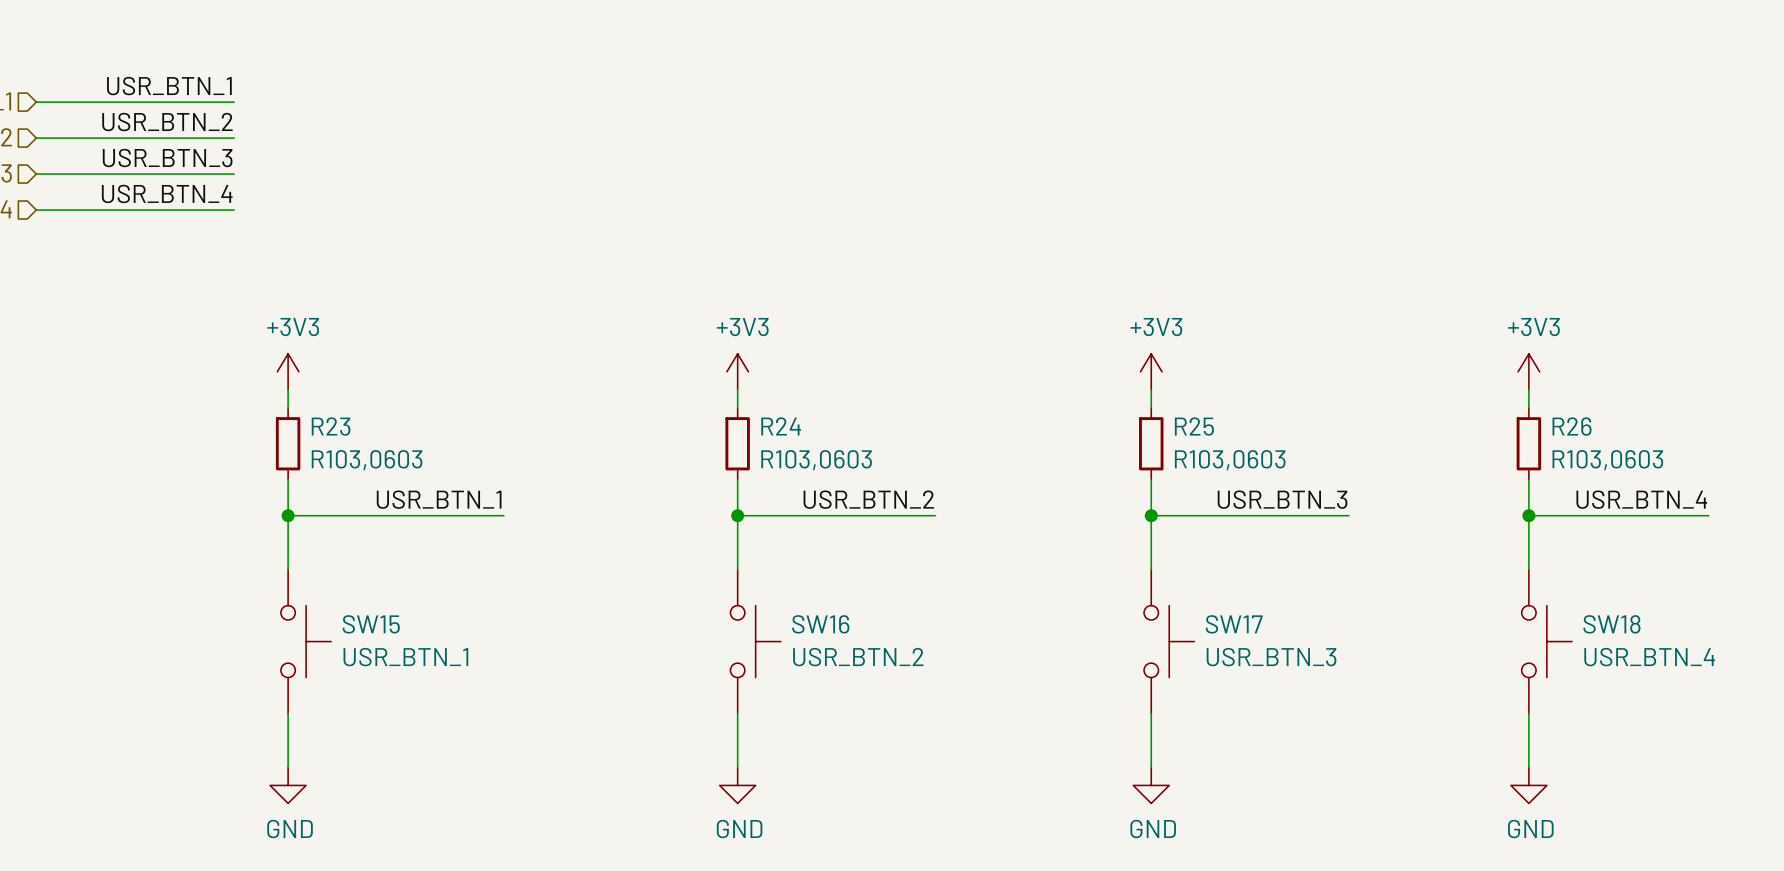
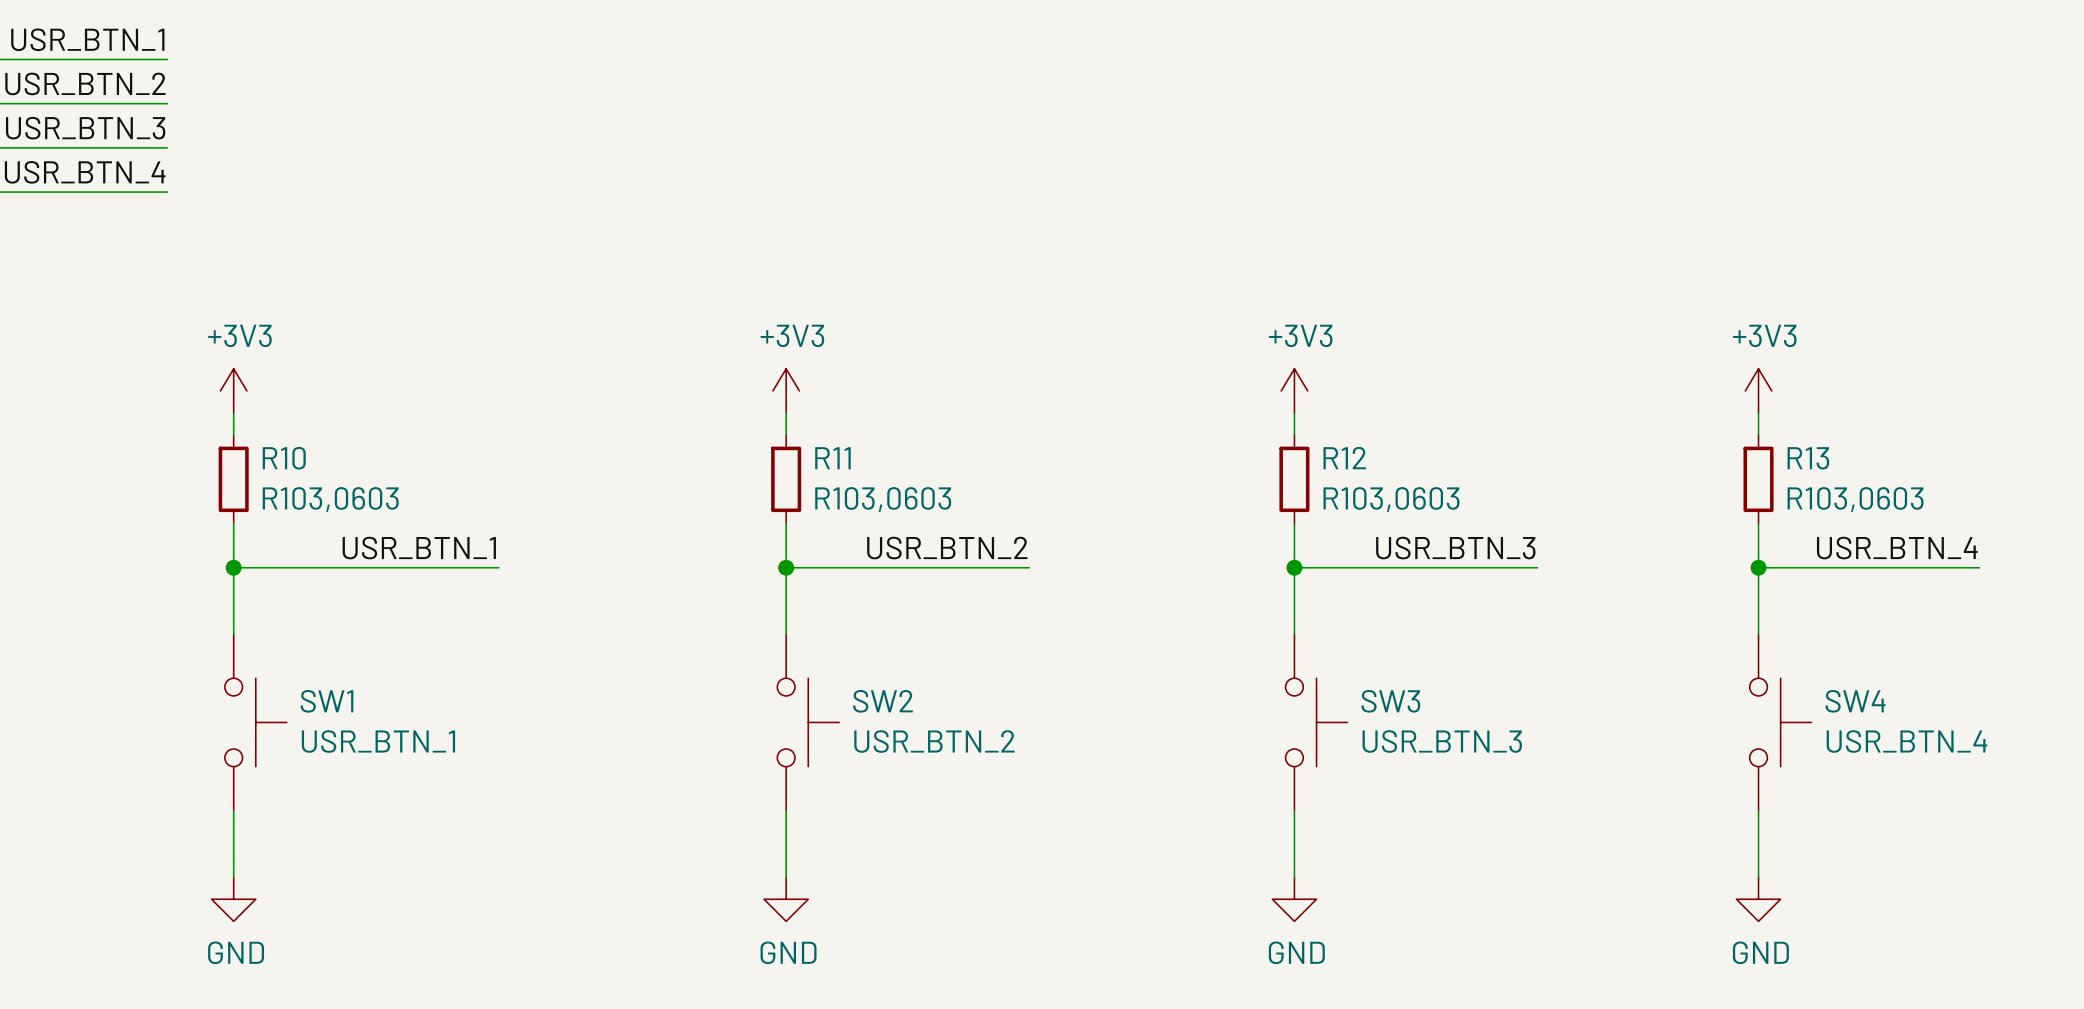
R23 name: R23 (331, 426) -> R10 (284, 458)
R24 name: R24 (781, 426) -> R11 (832, 458)
R25 name: R25 (1194, 426) -> R12 (1344, 458)
R26 name: R26 (1572, 426) -> R13 (1808, 458)
SW15 name: SW15 (371, 624) -> SW1 (327, 701)
SW16 name: SW16 (820, 624) -> SW2 (883, 701)
SW17 name: SW17 (1234, 624) -> SW3 (1390, 701)
SW18 name: SW18 (1611, 624) -> SW4 (1855, 701)

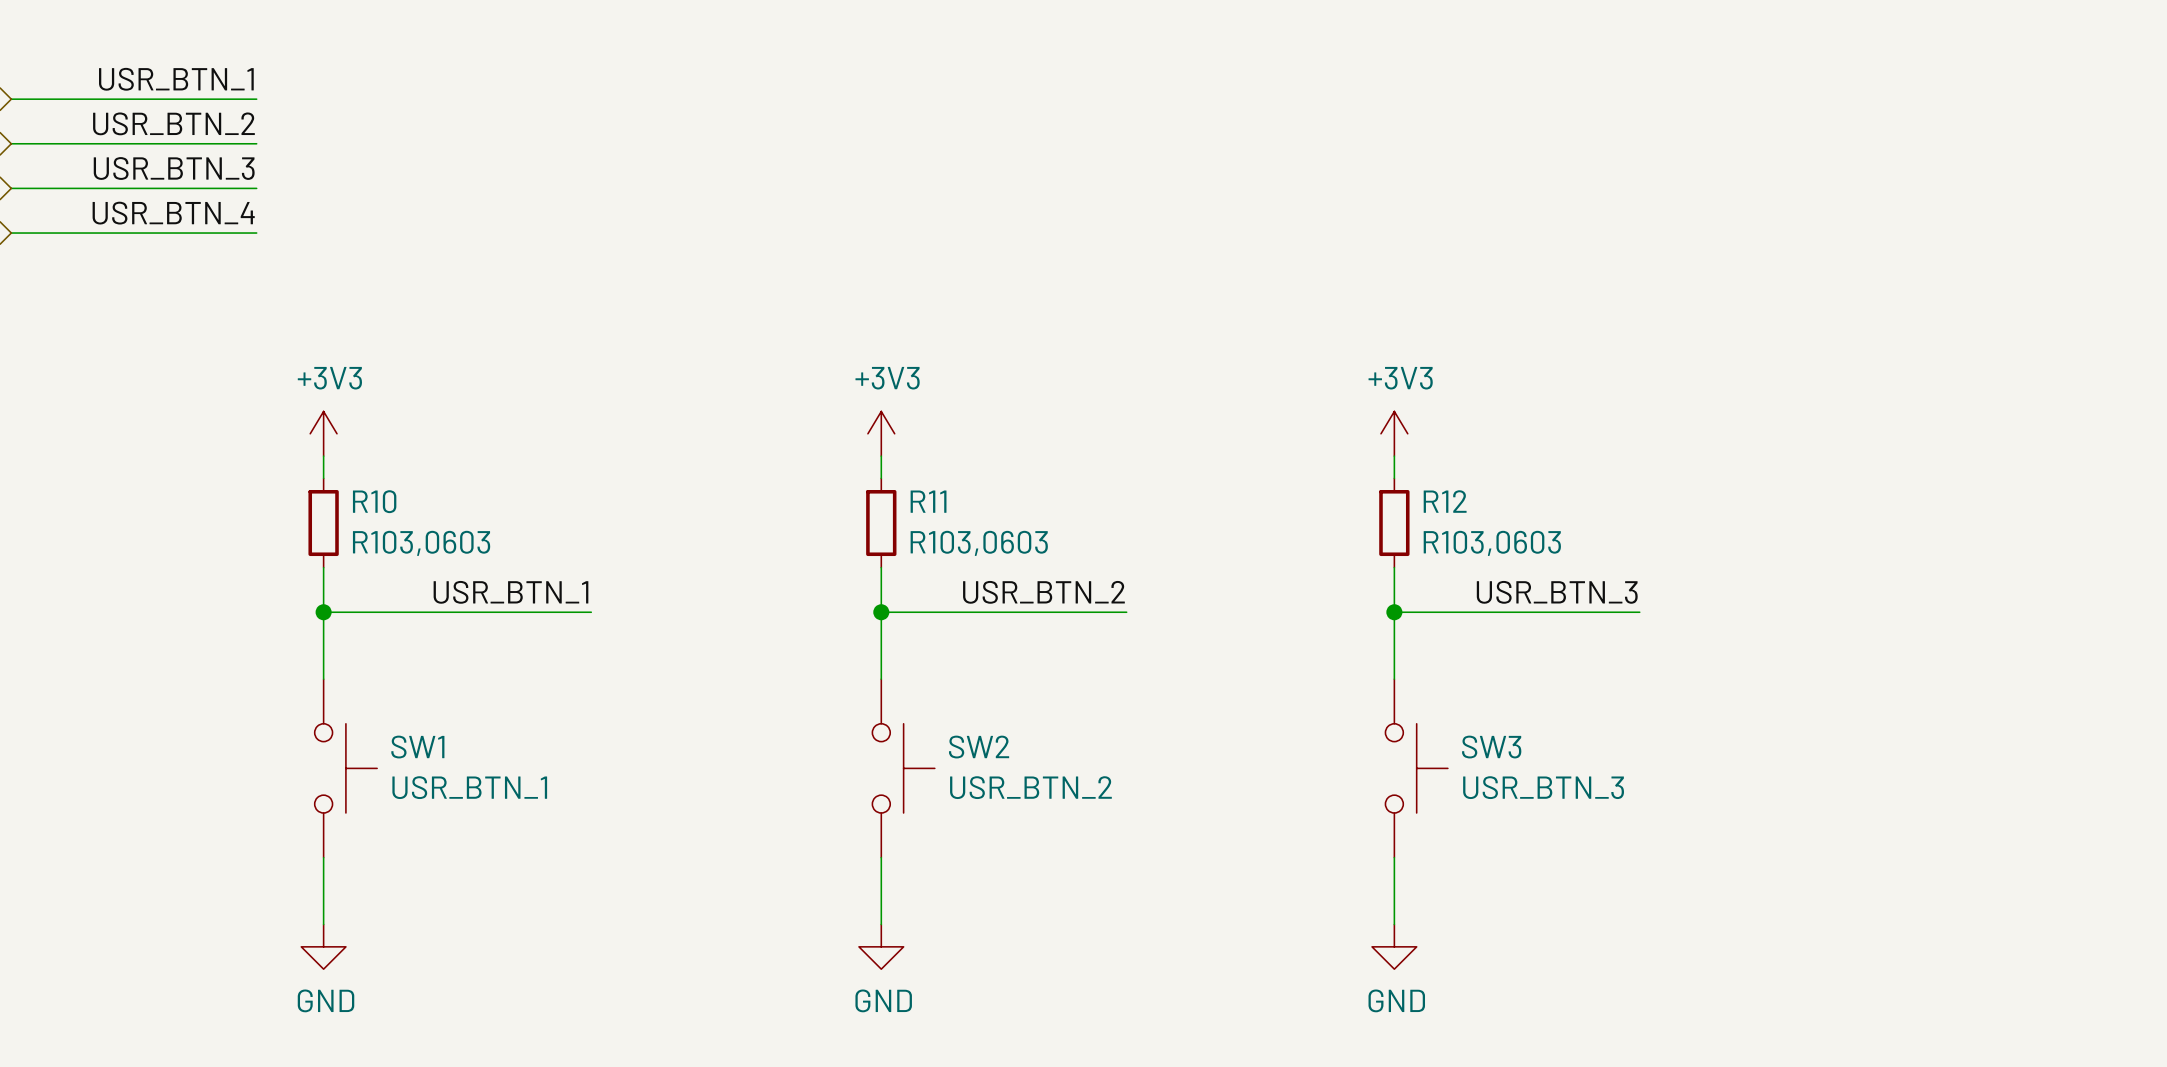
power symbol: +3V3 (1758, 390) -> none
wire: (1758, 413) (1758, 435) -> none
R13: R103,0603 (1758, 479) -> none
wire: (1758, 523) (1758, 634) -> none
label: USR_BTN_4 (1897, 548) -> none
wire: (1758, 567) (1979, 567) -> none
junction: (1758, 567) -> none
SW4: USR_BTN_4 (1780, 722) -> none
wire: (1758, 810) (1758, 877) -> none
power symbol: GND (1758, 899) -> none

